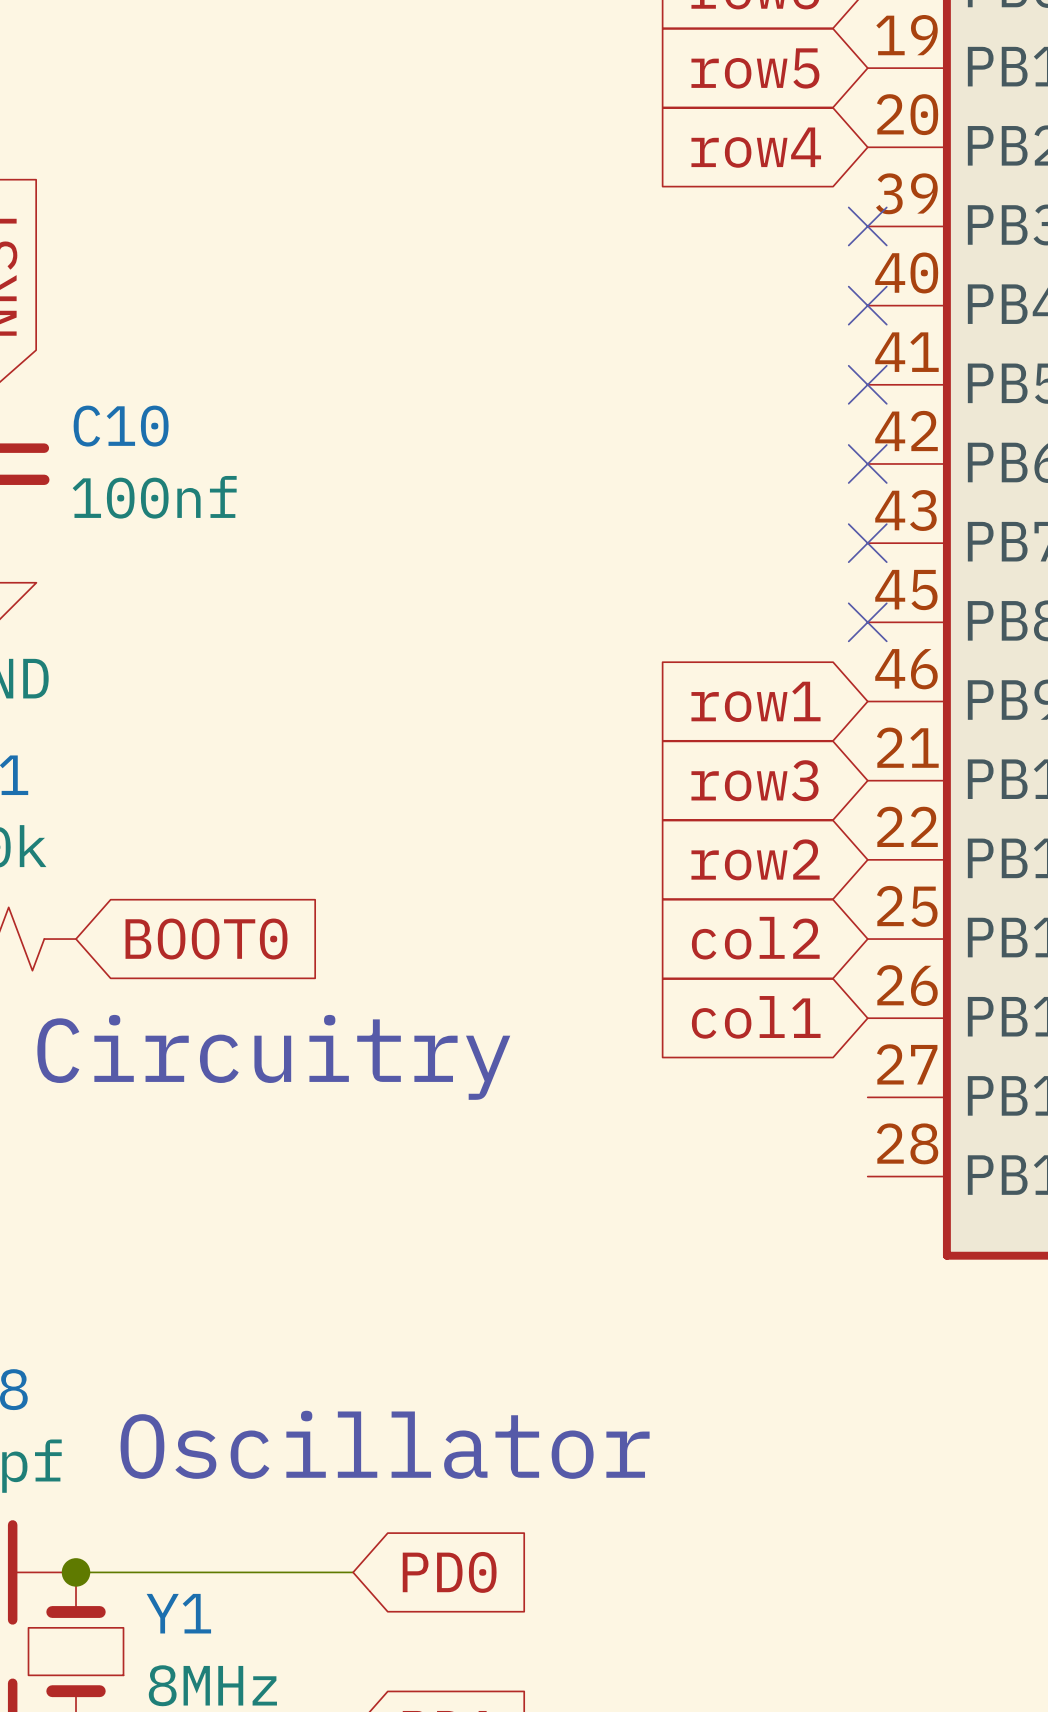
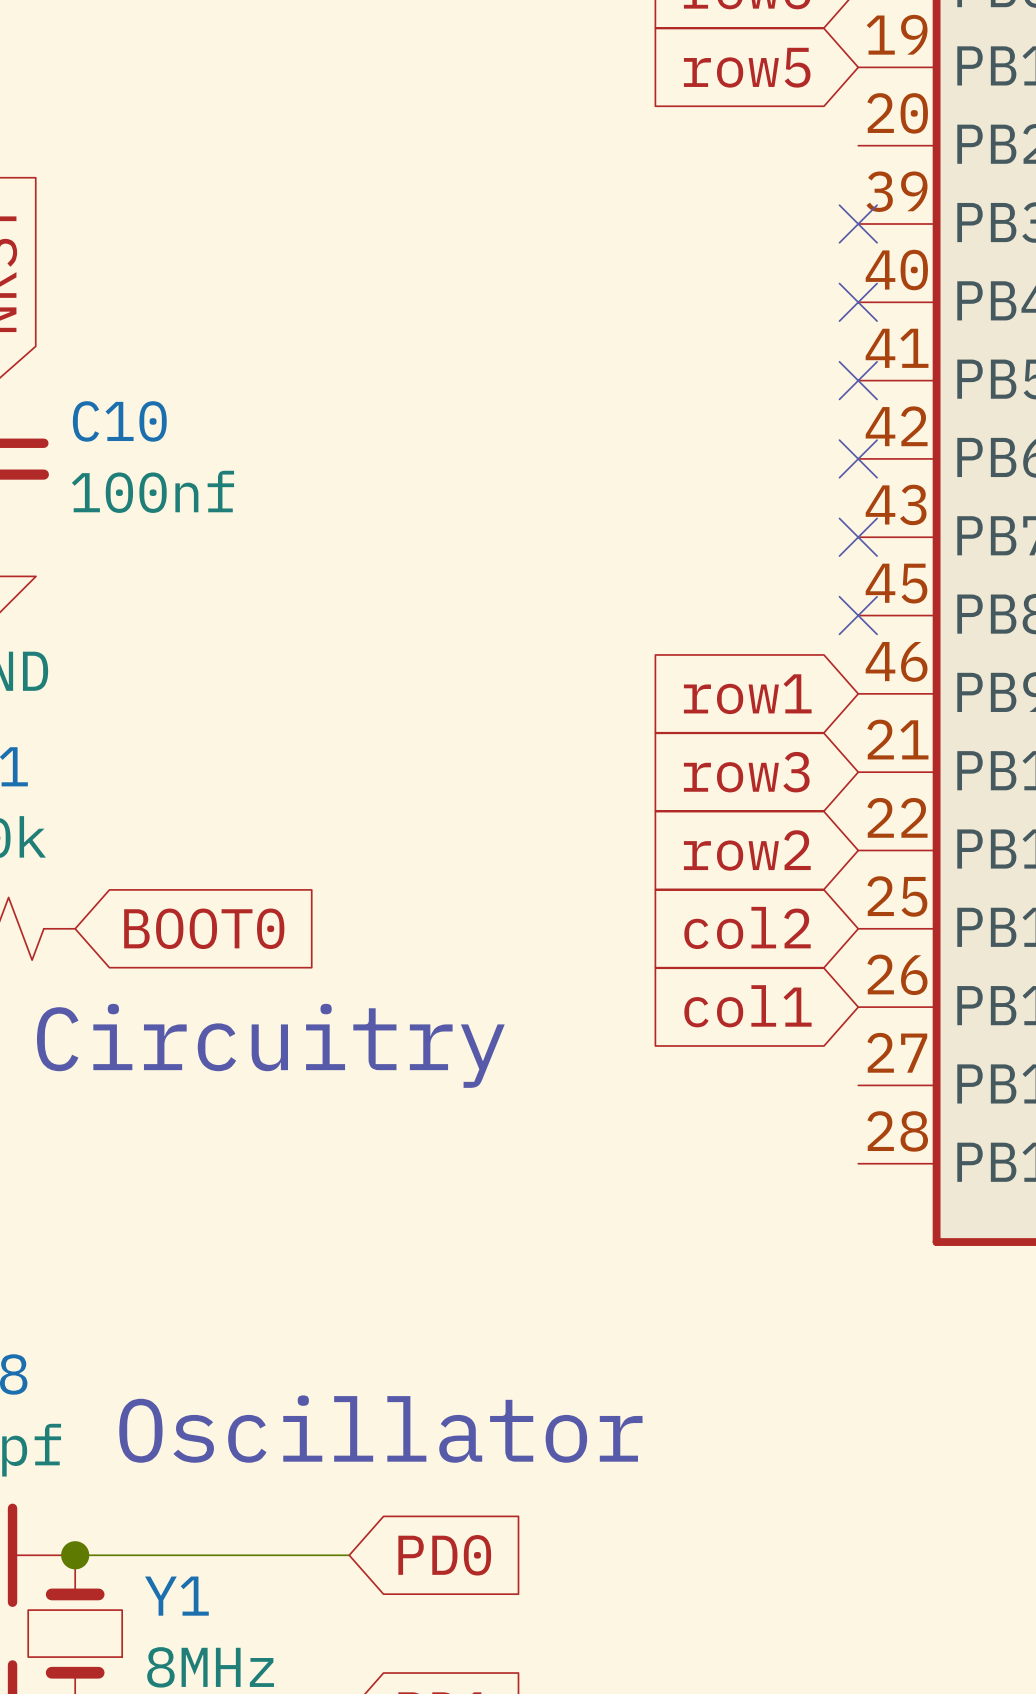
global label: row4 (756, 147) -> none

